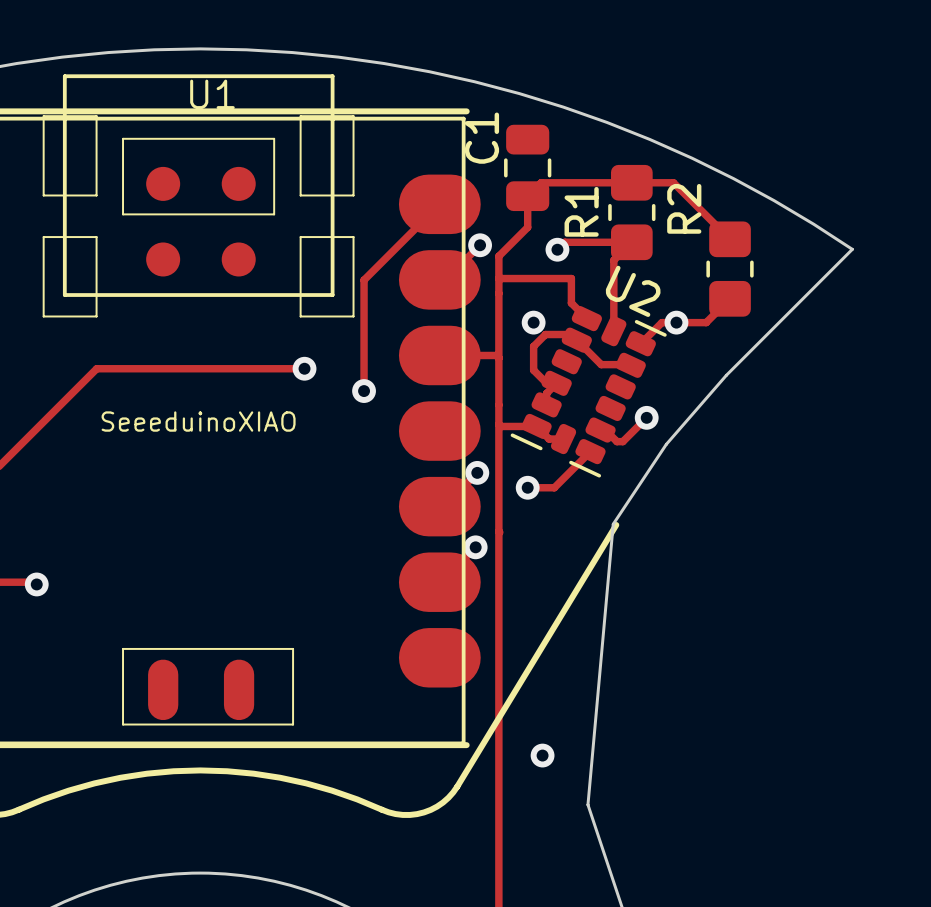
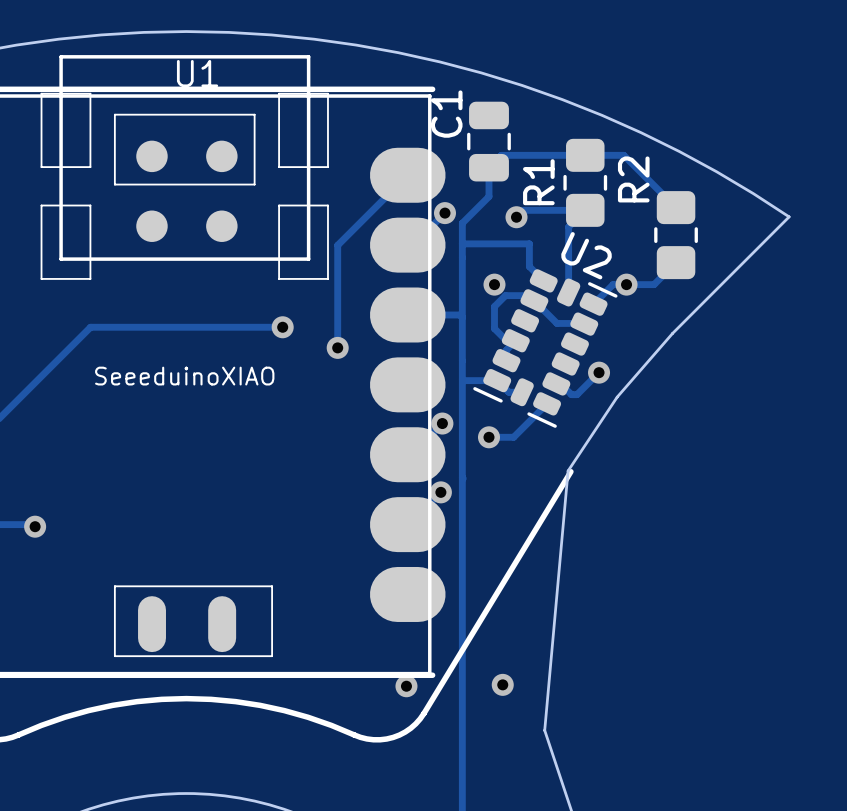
via: none -> (406, 686)

